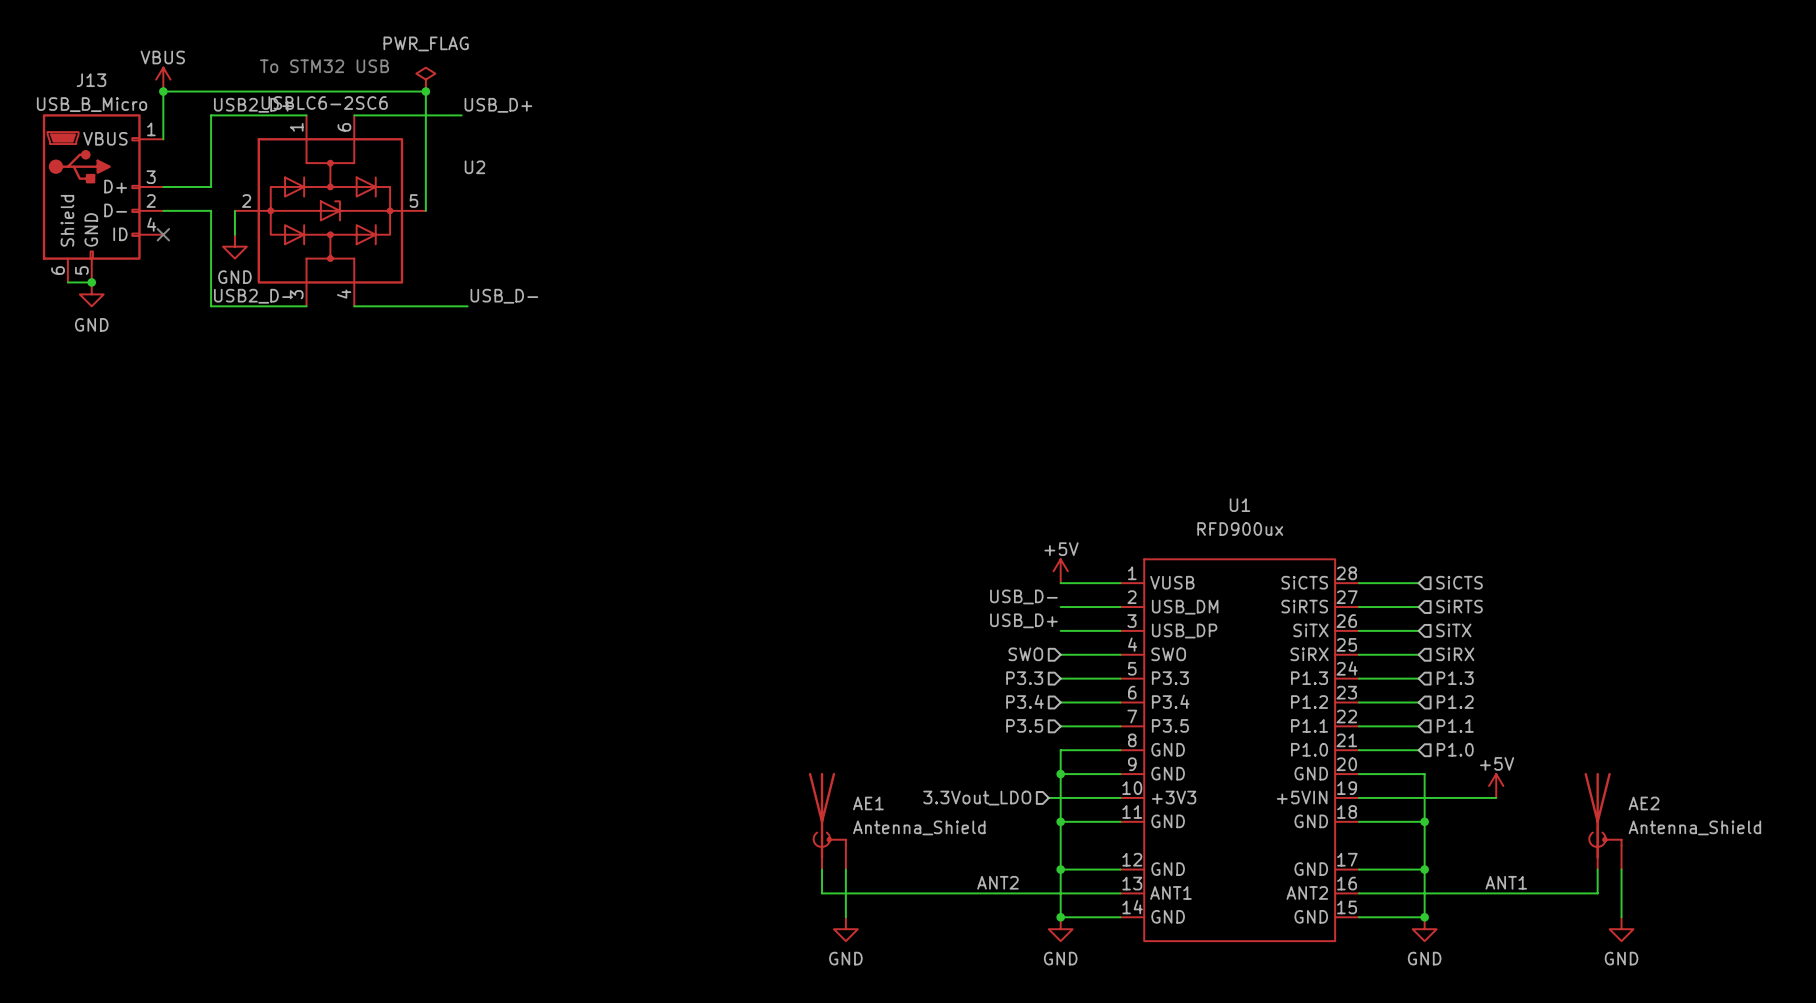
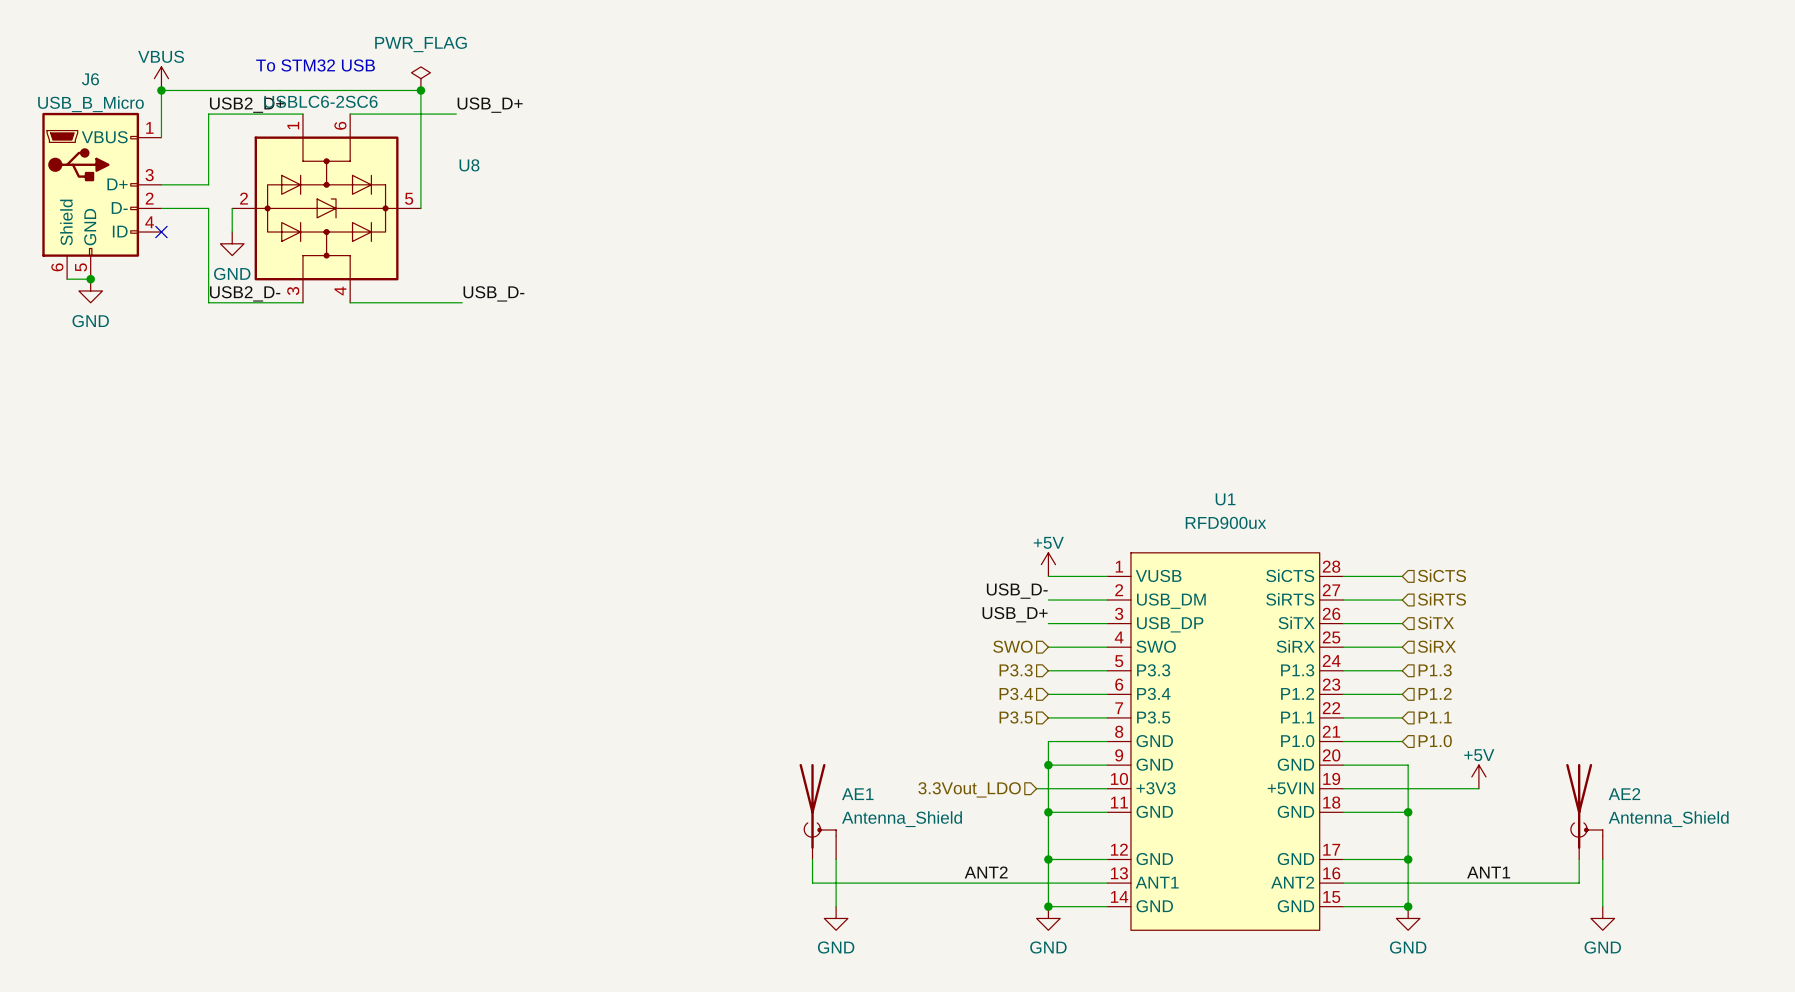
J13 name: J13 (91, 80) -> J6 (90, 79)
U2 name: U2 (474, 167) -> U8 (469, 165)

